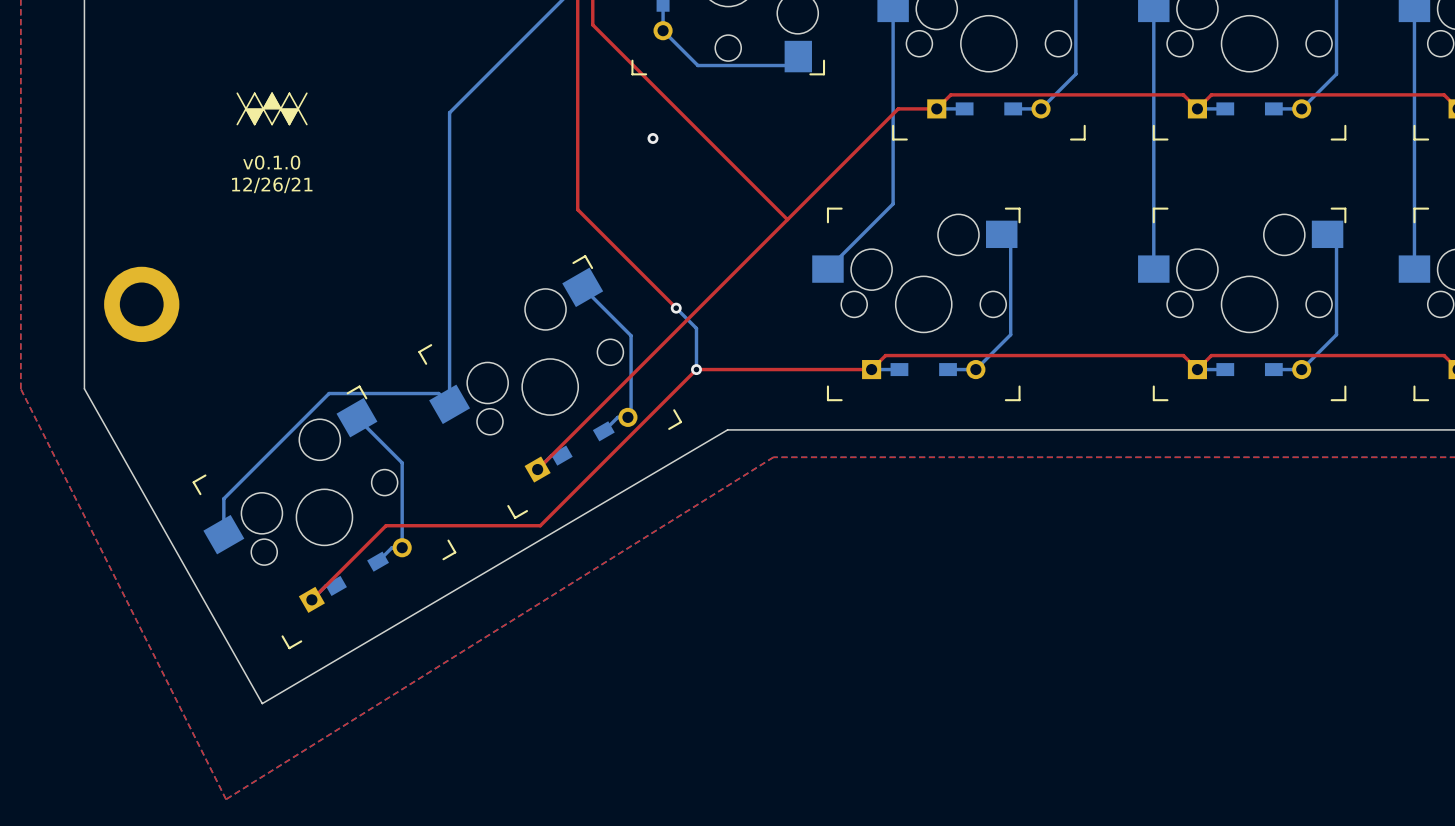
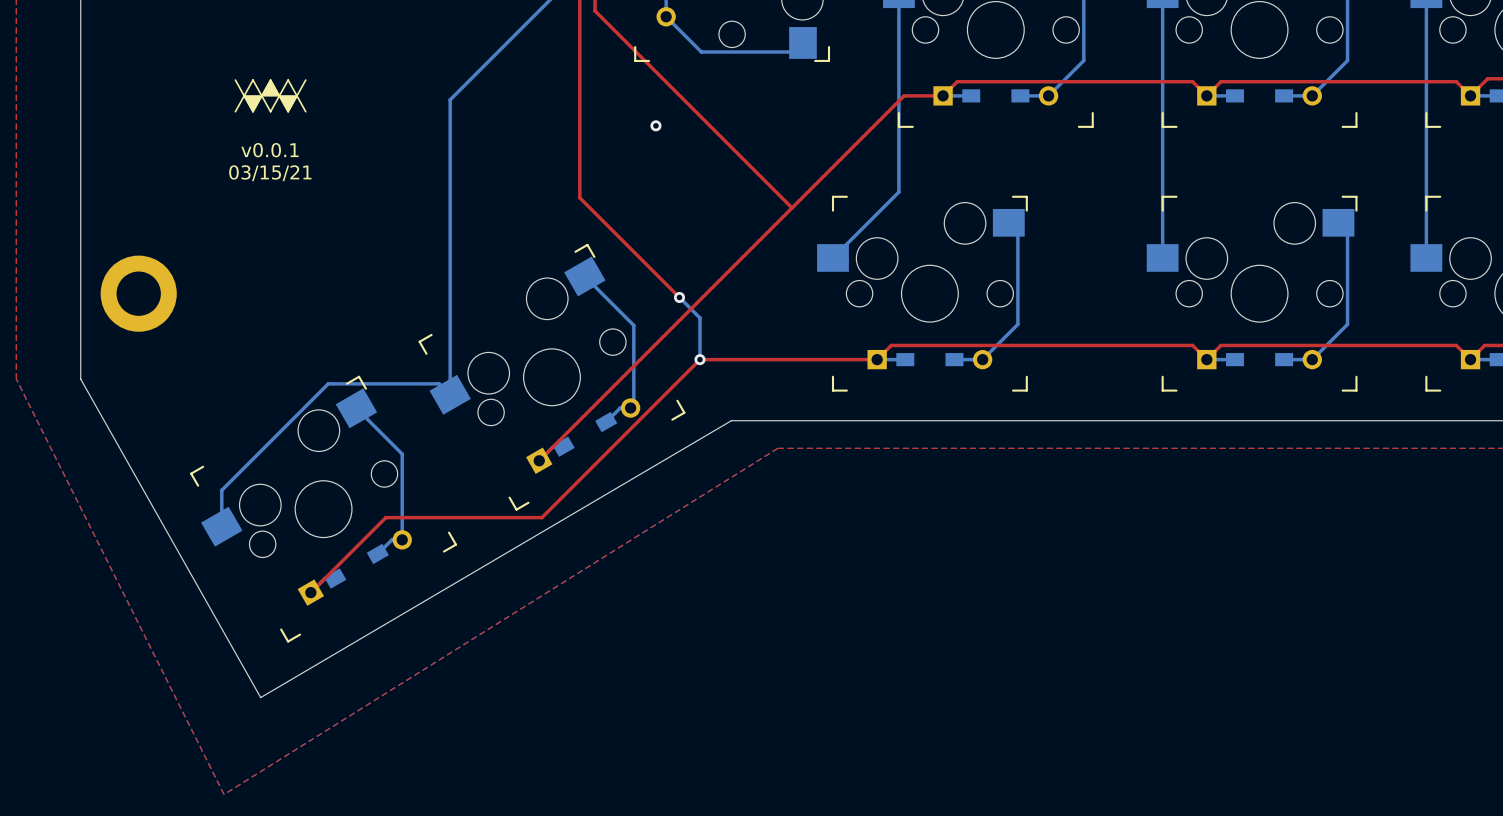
text: v0.1.0 (271, 162) -> v0.0.1 (269, 150)
text: 12/26/21 (272, 185) -> 03/15/21 (270, 173)

